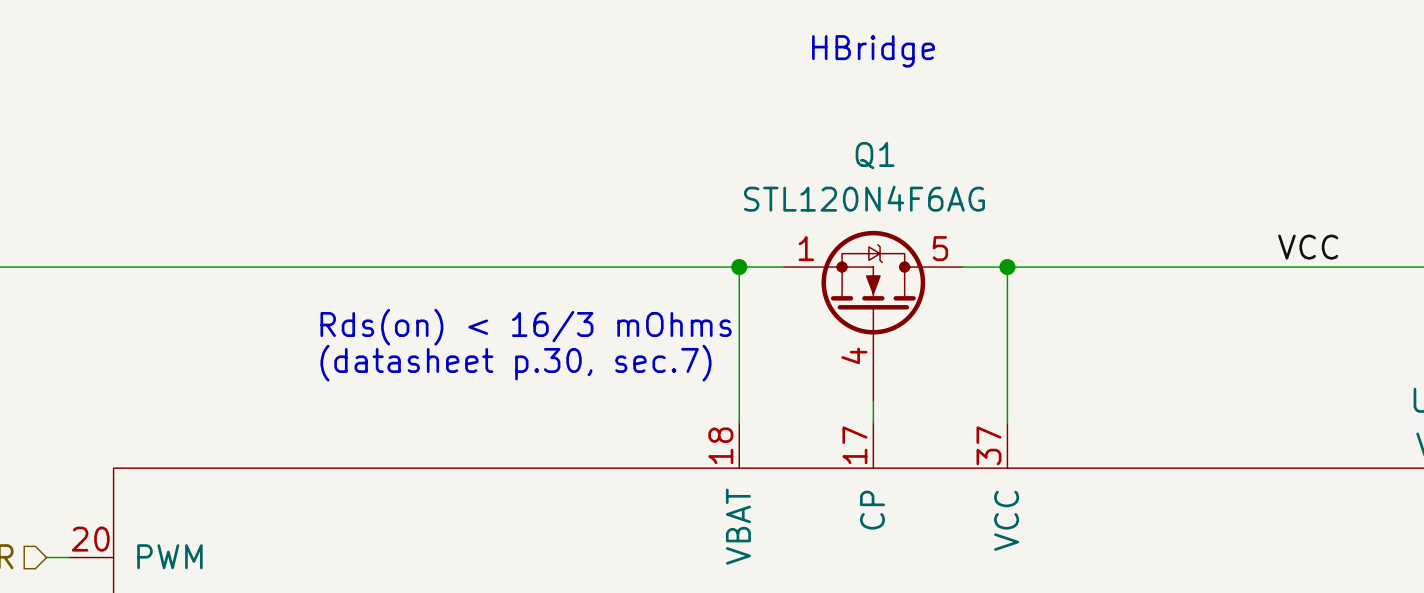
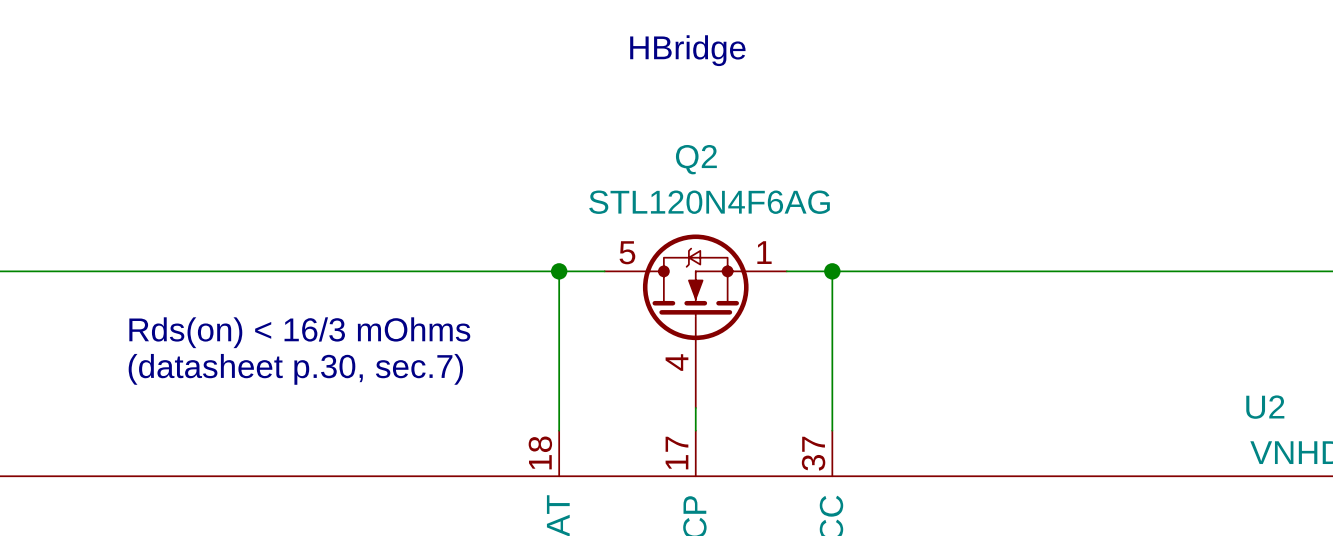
label: VCC (1308, 247) -> none
Q1: STL120N4F6AG (873, 315) -> none
Q2: none -> STL120N4F6AG (695, 321)

